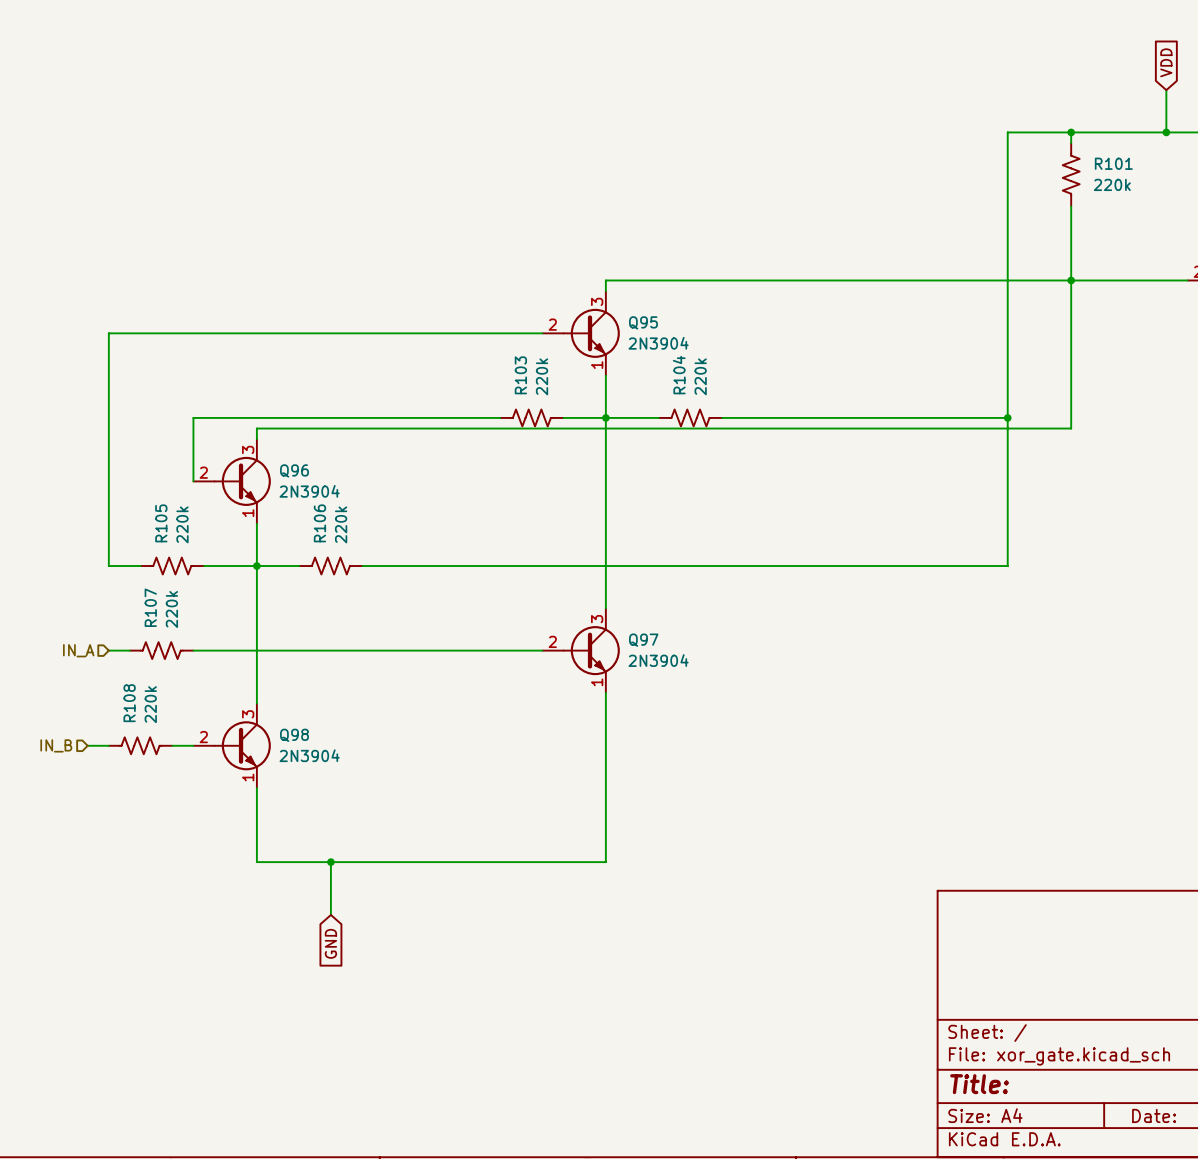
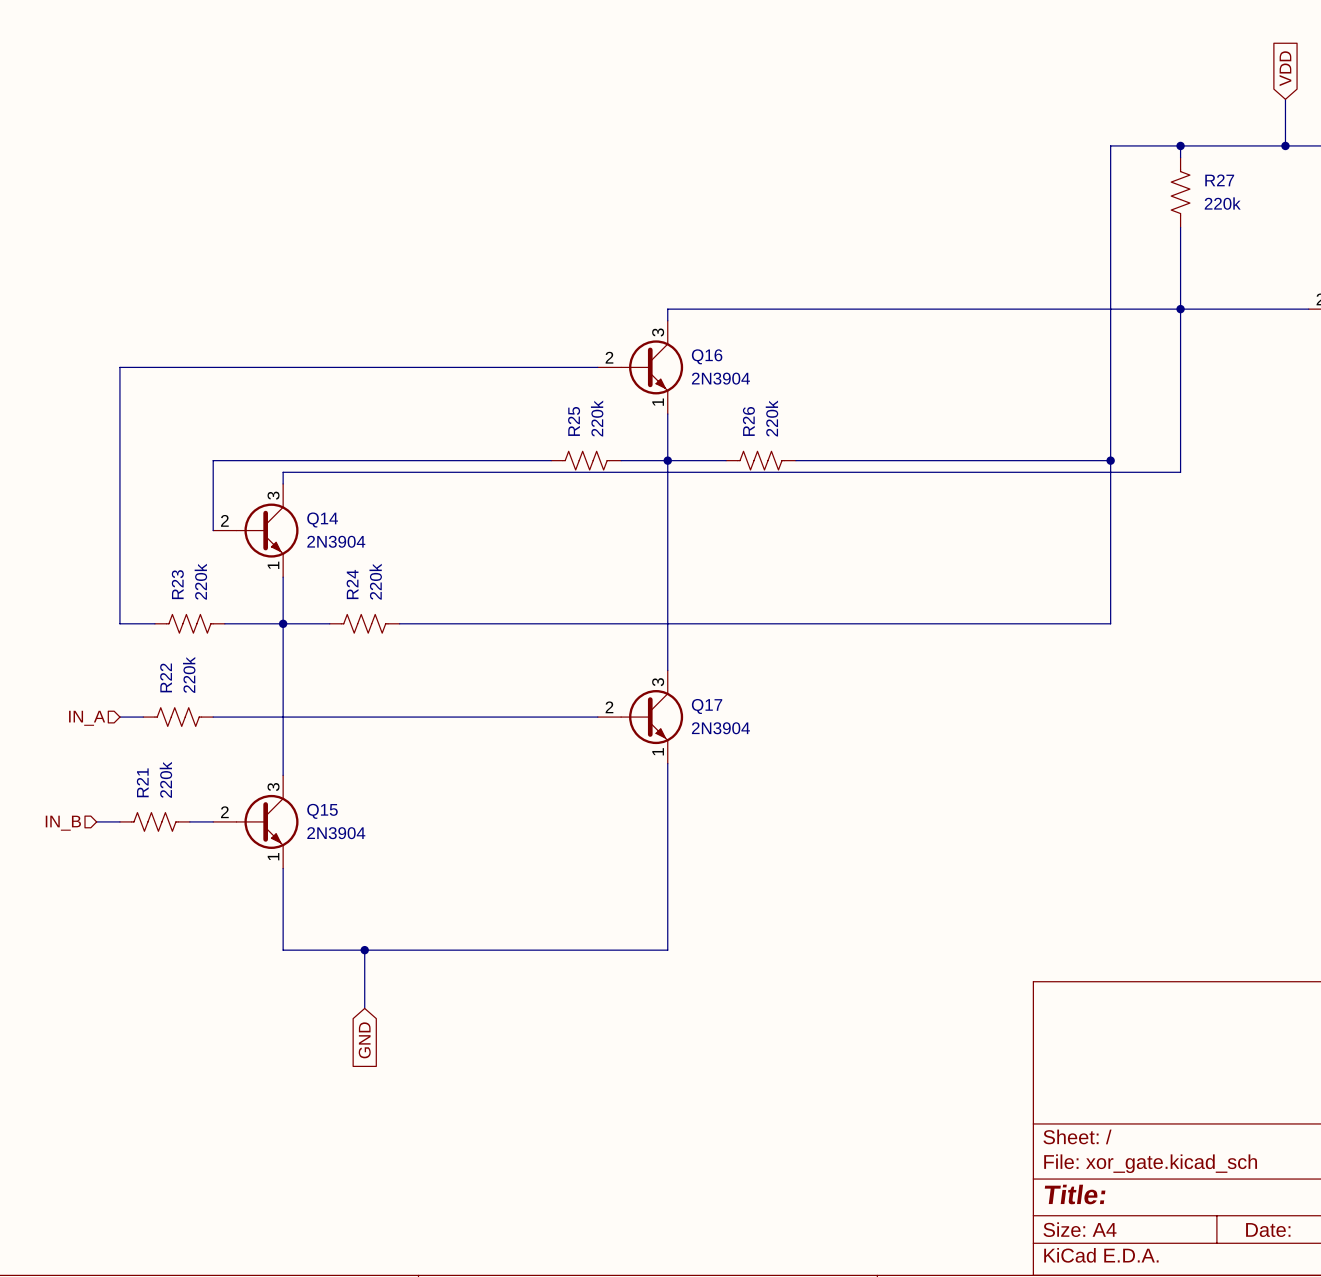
R101 name: R101 (1113, 163) -> R27 (1219, 180)
Q95 name: Q95 (643, 322) -> Q16 (707, 356)
R103 name: R103 (520, 375) -> R25 (574, 421)
R104 name: R104 (679, 375) -> R26 (748, 421)
Q96 name: Q96 (294, 470) -> Q14 (322, 519)
R105 name: R105 (161, 523) -> R23 (177, 584)
R106 name: R106 (319, 523) -> R24 (352, 584)
R107 name: R107 (150, 607) -> R22 (166, 677)
Q97 name: Q97 (643, 640) -> Q17 (707, 706)
R108 name: R108 (129, 703) -> R21 (142, 782)
Q98 name: Q98 (294, 735) -> Q15 (322, 811)

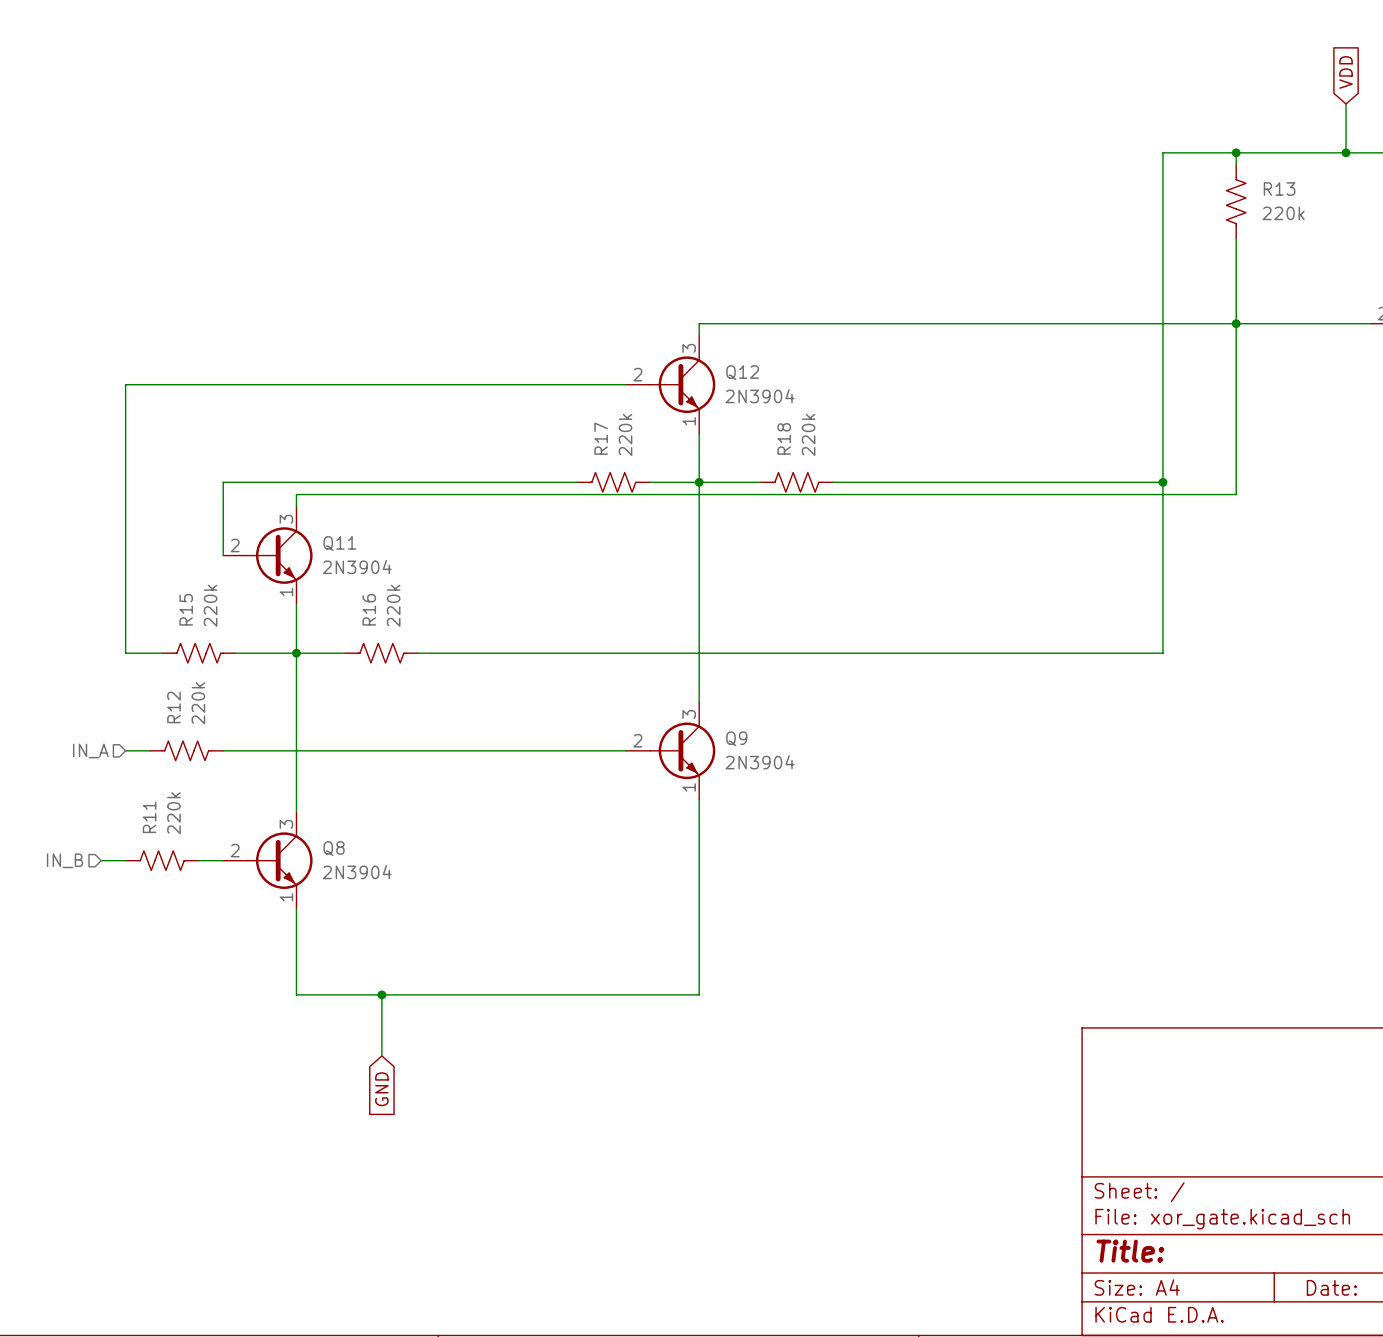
R27 name: R27 (1219, 180) -> R13 (1279, 188)
Q16 name: Q16 (707, 356) -> Q12 (742, 372)
R25 name: R25 (574, 421) -> R17 (601, 438)
R26 name: R26 (748, 421) -> R18 (784, 438)
Q14 name: Q14 (322, 519) -> Q11 (339, 543)
R23 name: R23 (177, 584) -> R15 (186, 609)
R24 name: R24 (352, 584) -> R16 (369, 609)
R22 name: R22 (166, 677) -> R12 (173, 707)
Q17 name: Q17 (707, 706) -> Q9 (736, 738)
R21 name: R21 (142, 782) -> R11 (149, 817)
Q15 name: Q15 (322, 811) -> Q8 (334, 848)

